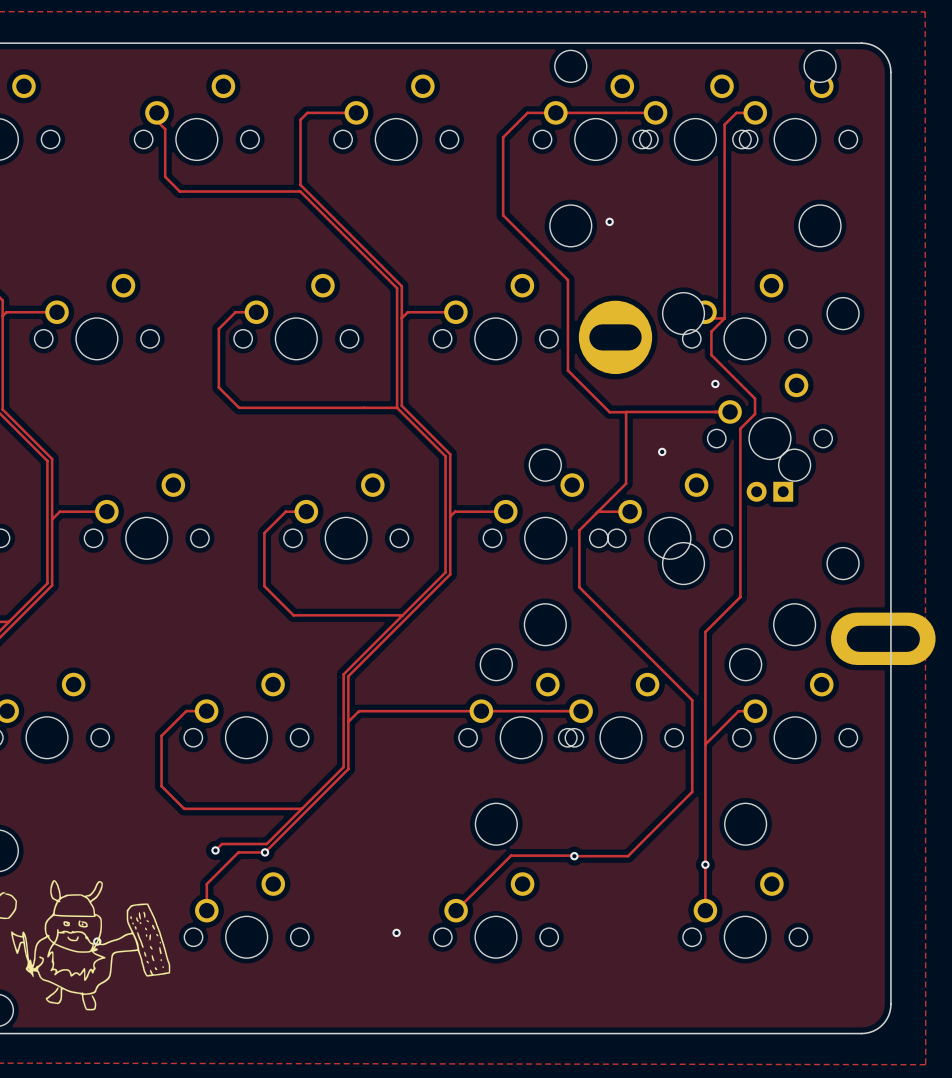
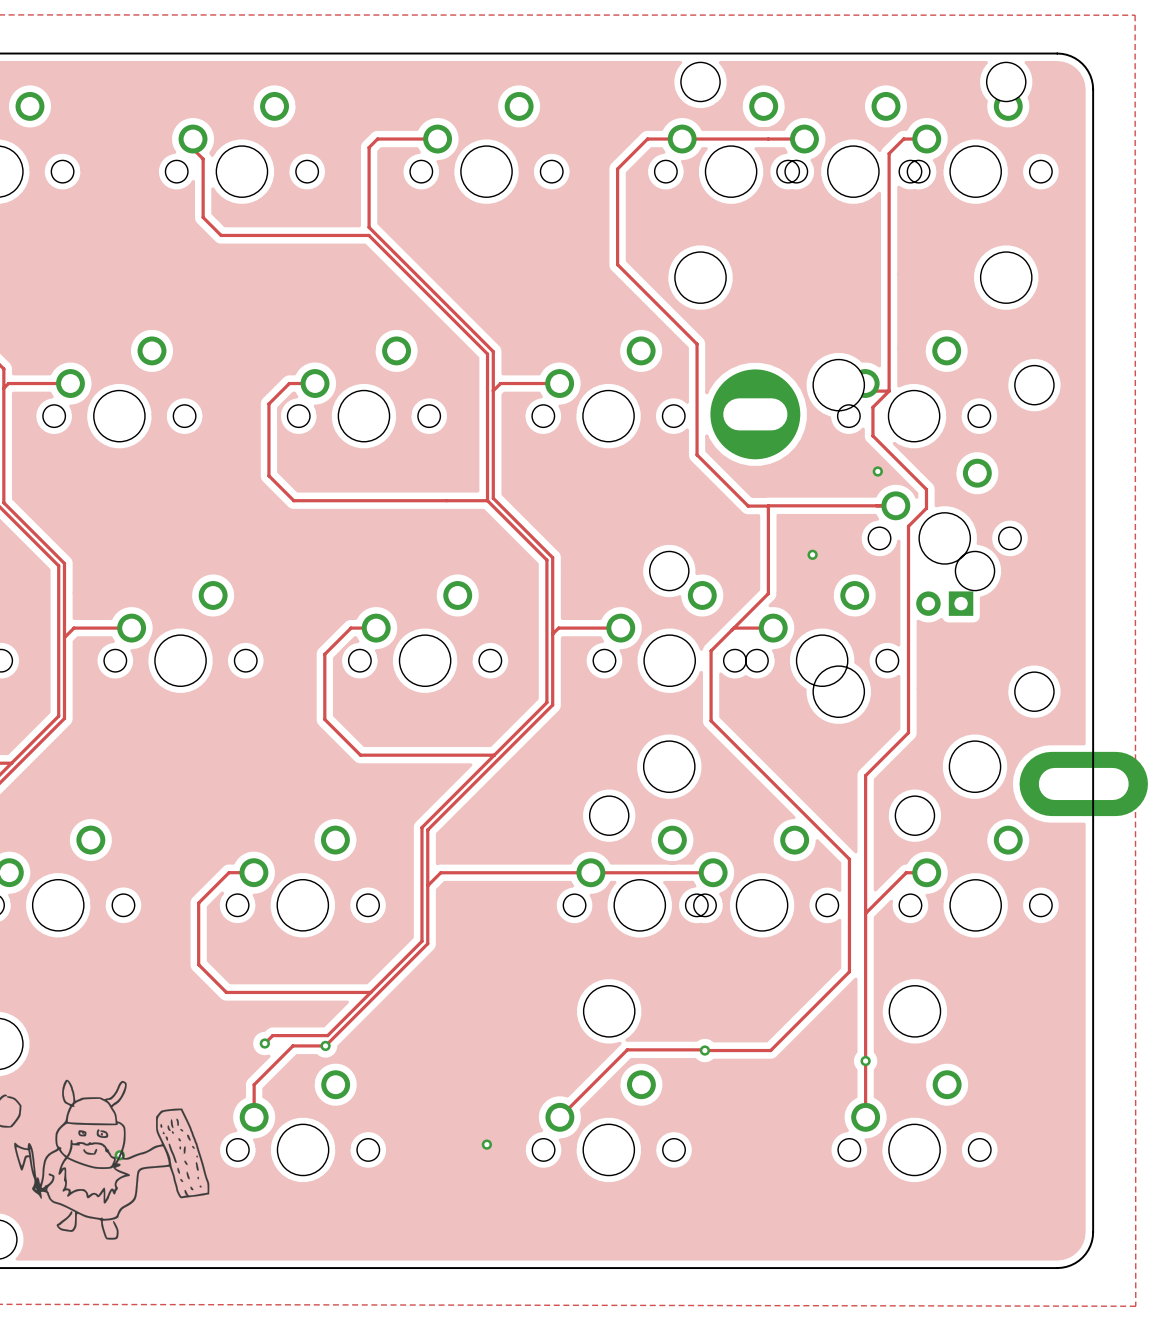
via: (609, 221) -> none

